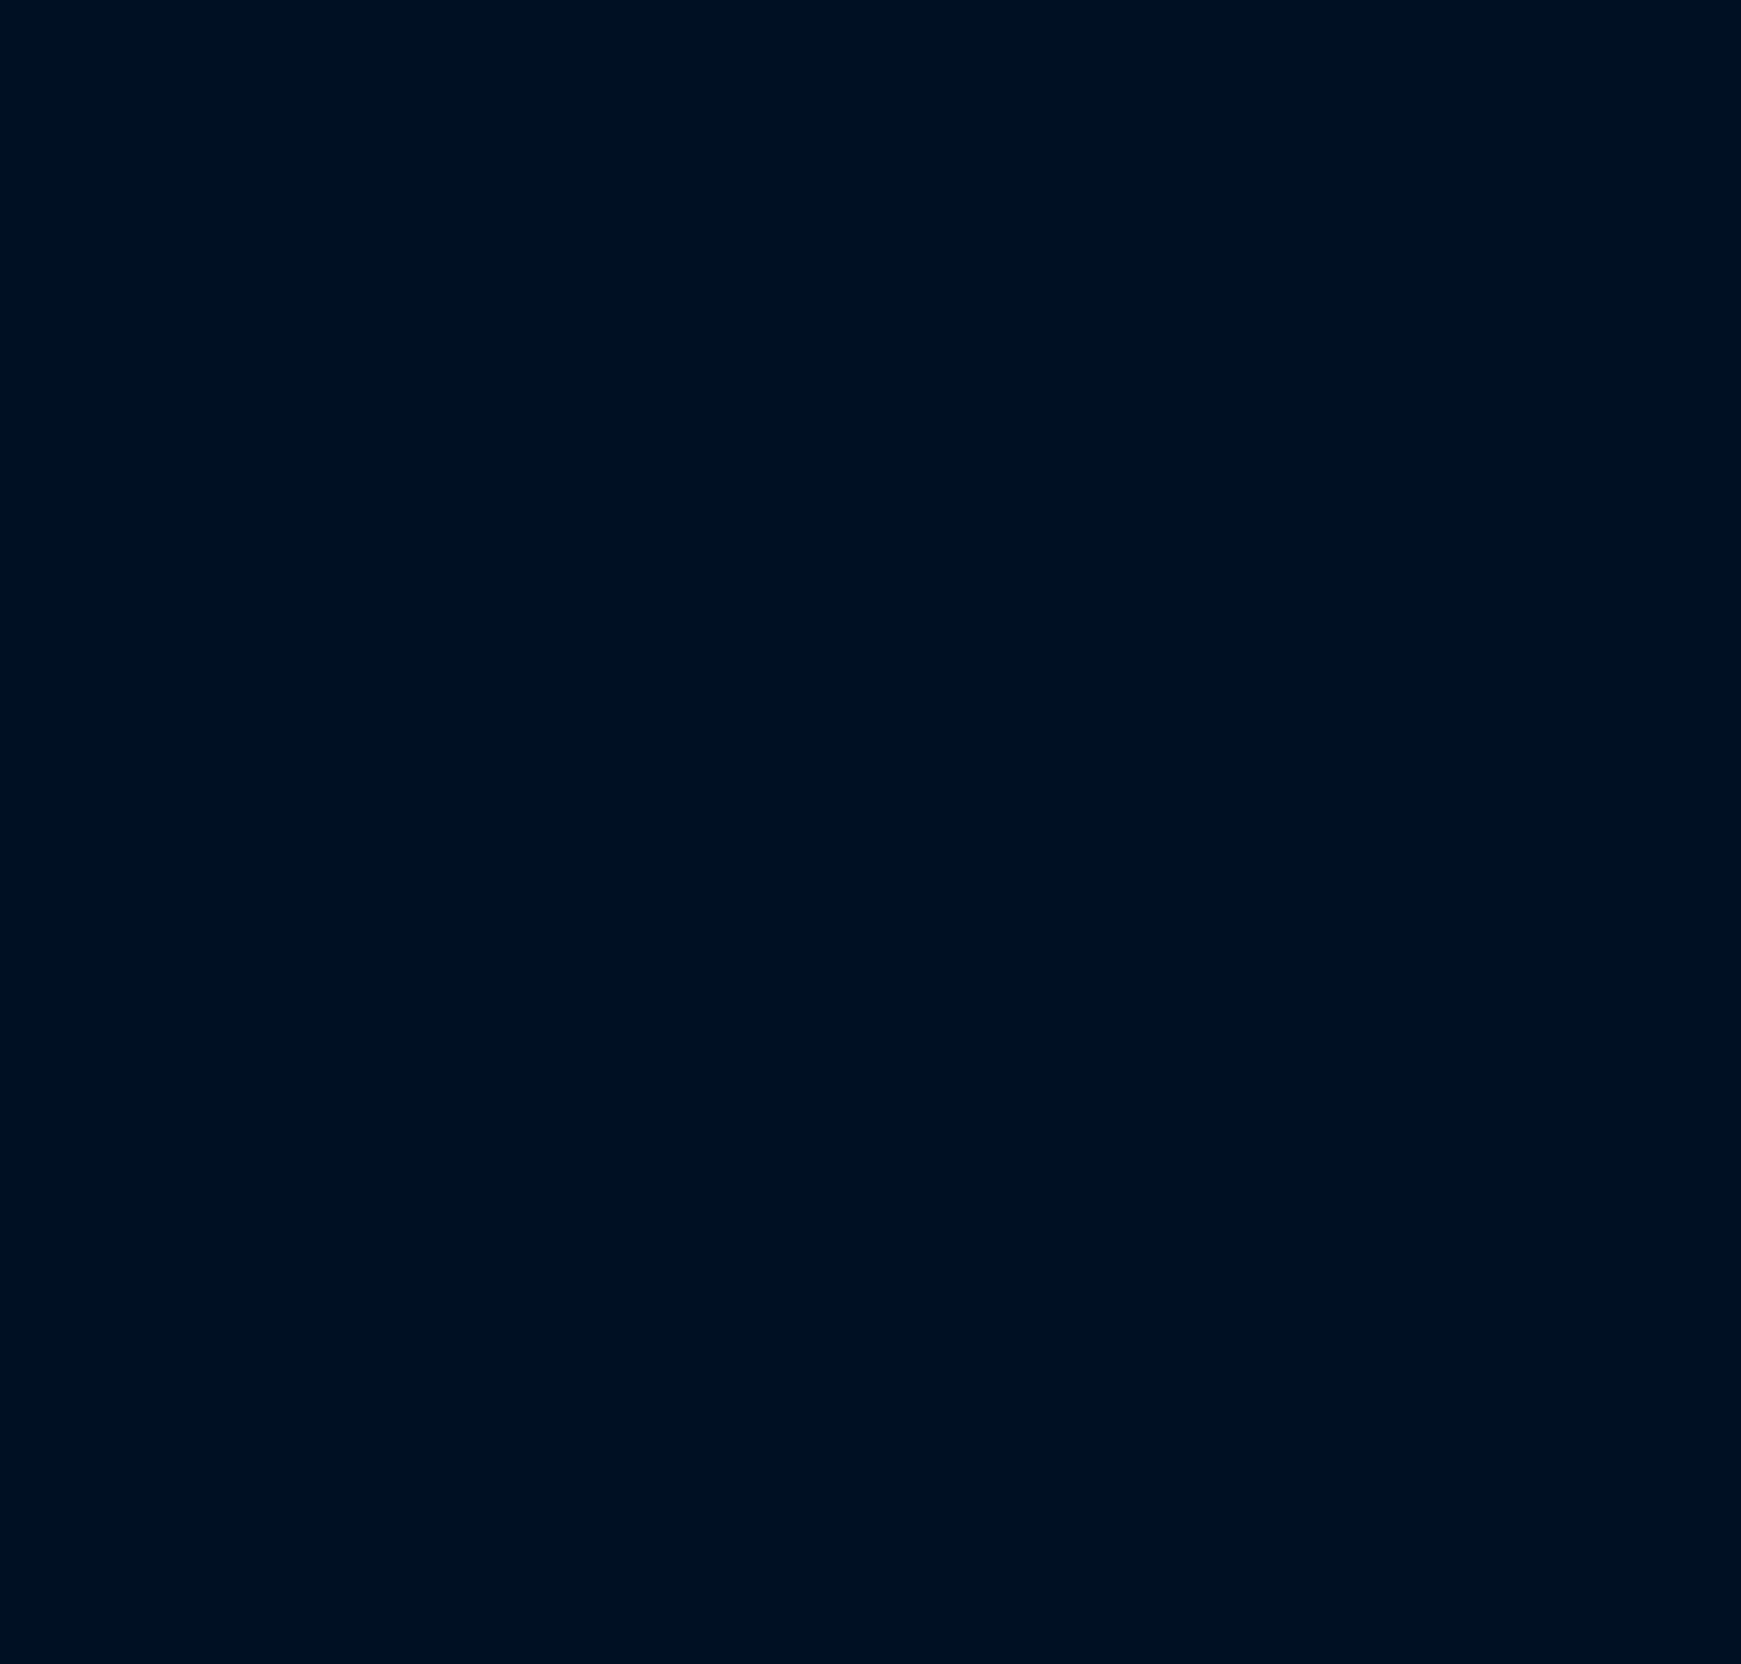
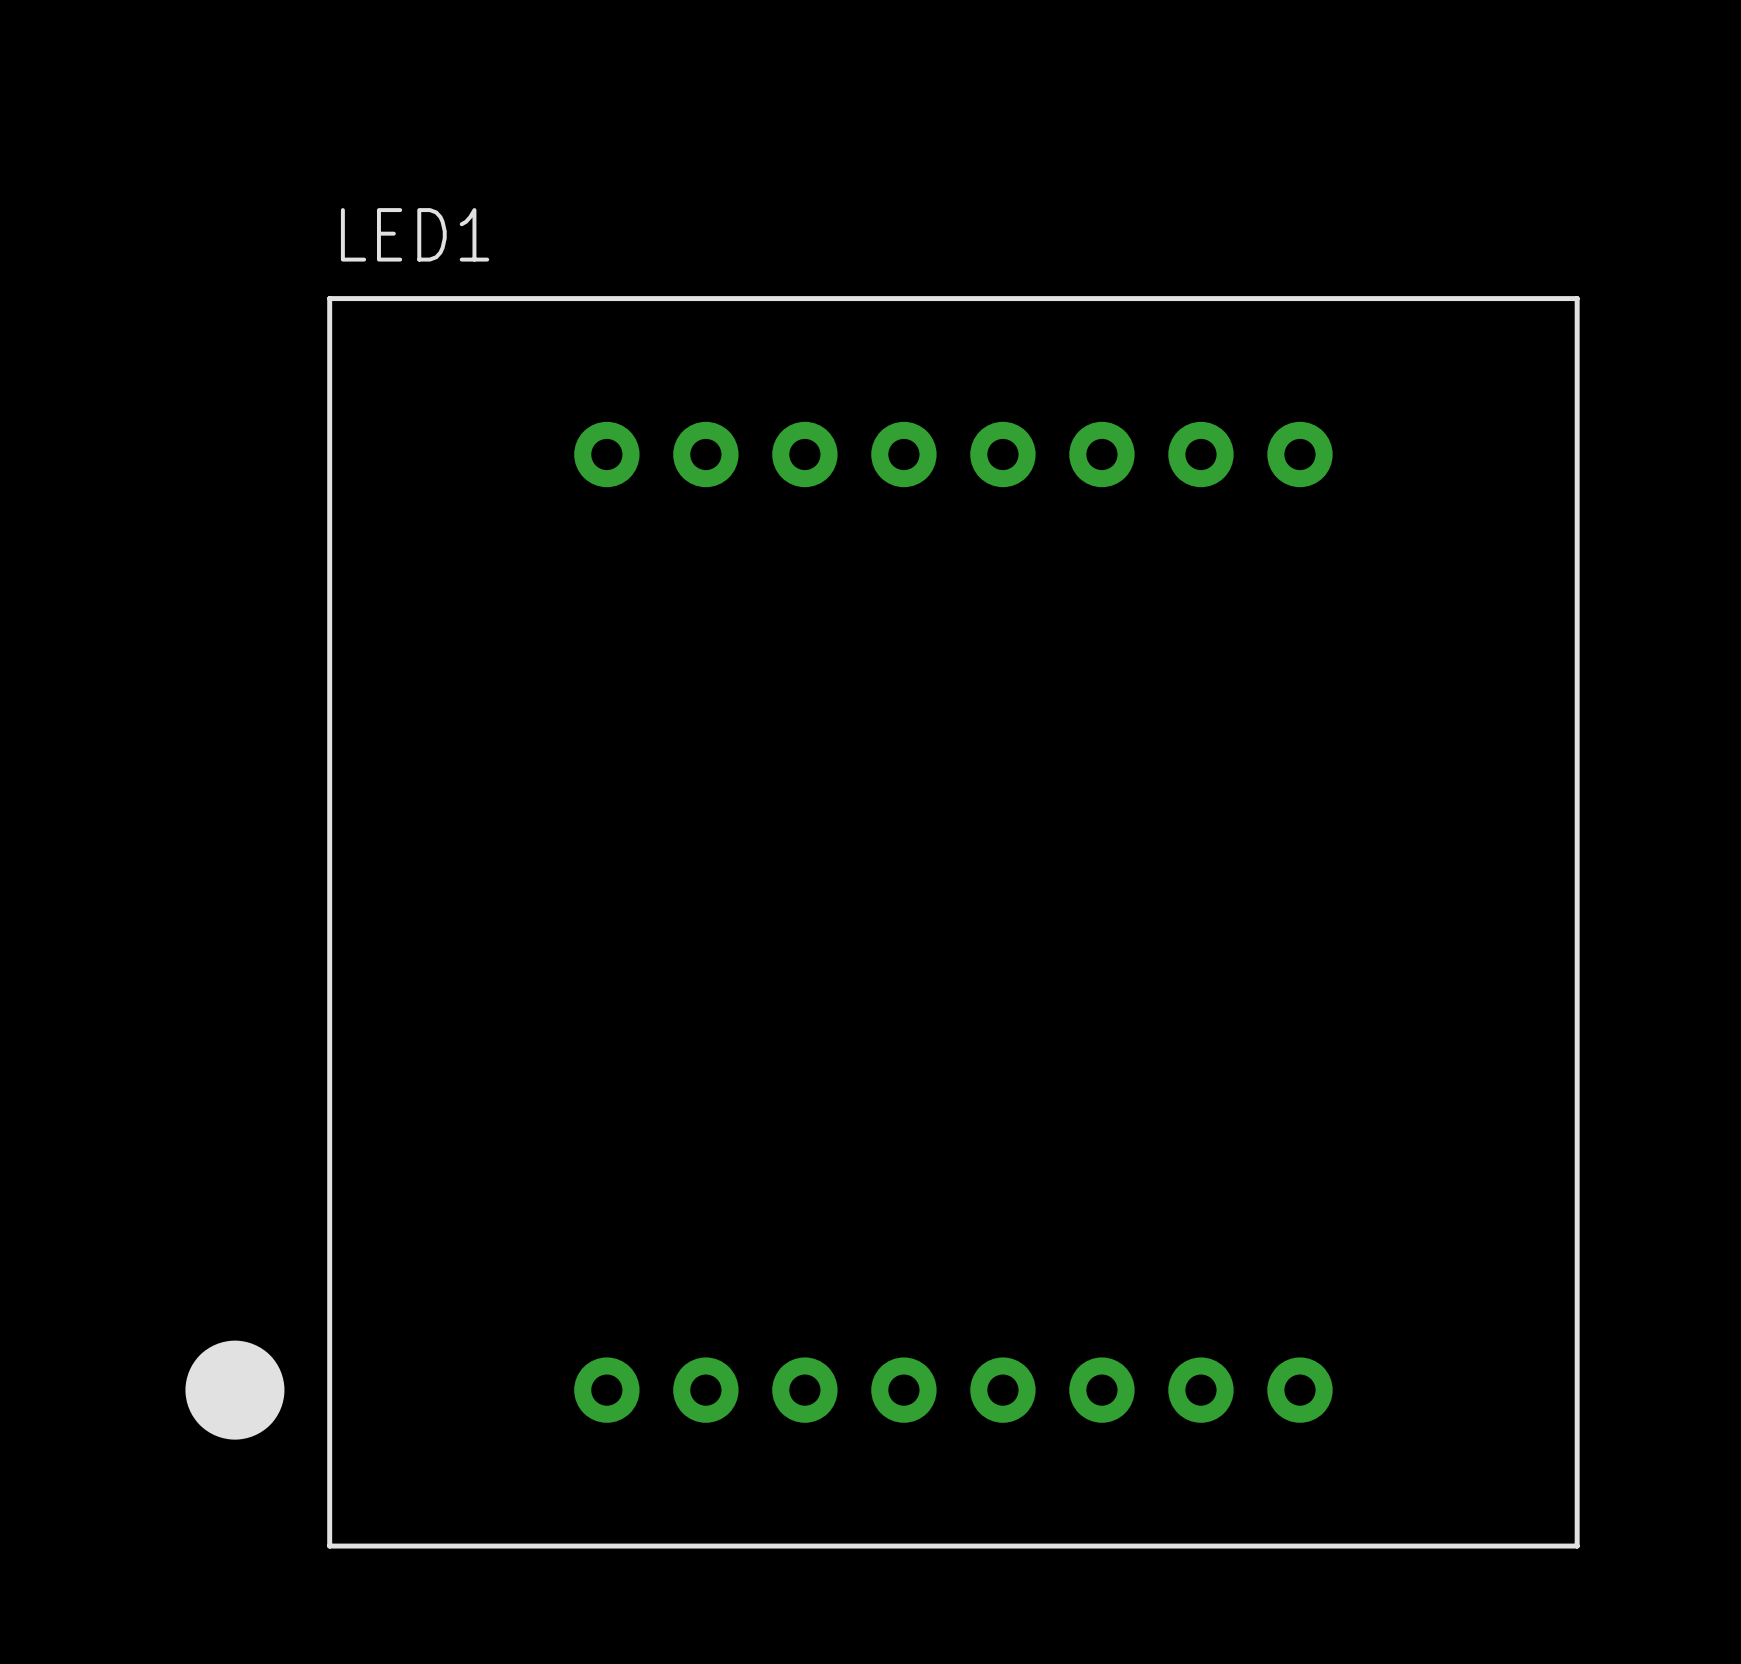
LED1: none -> (882, 922)

